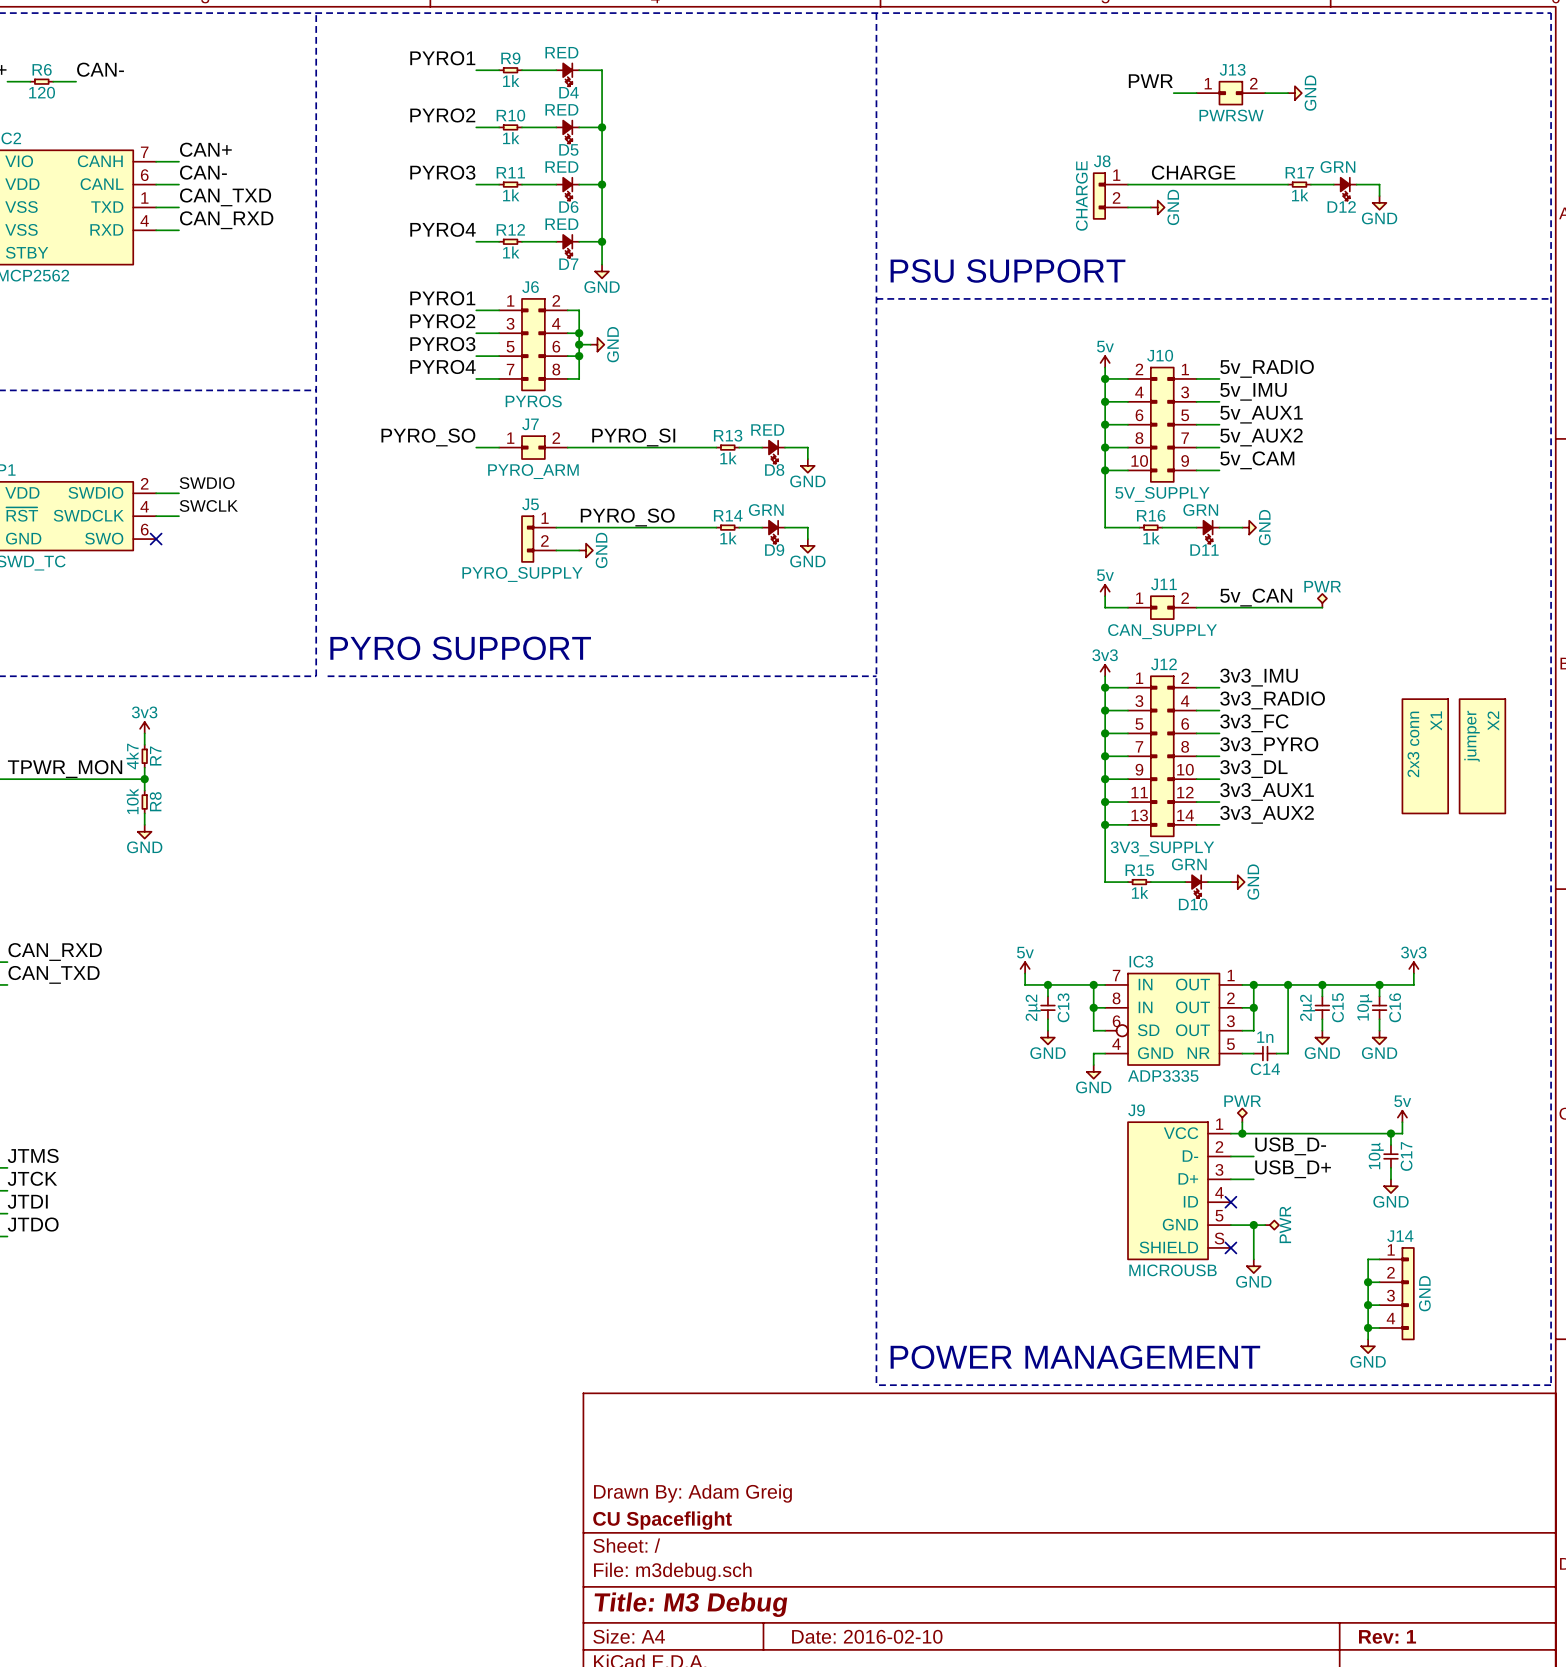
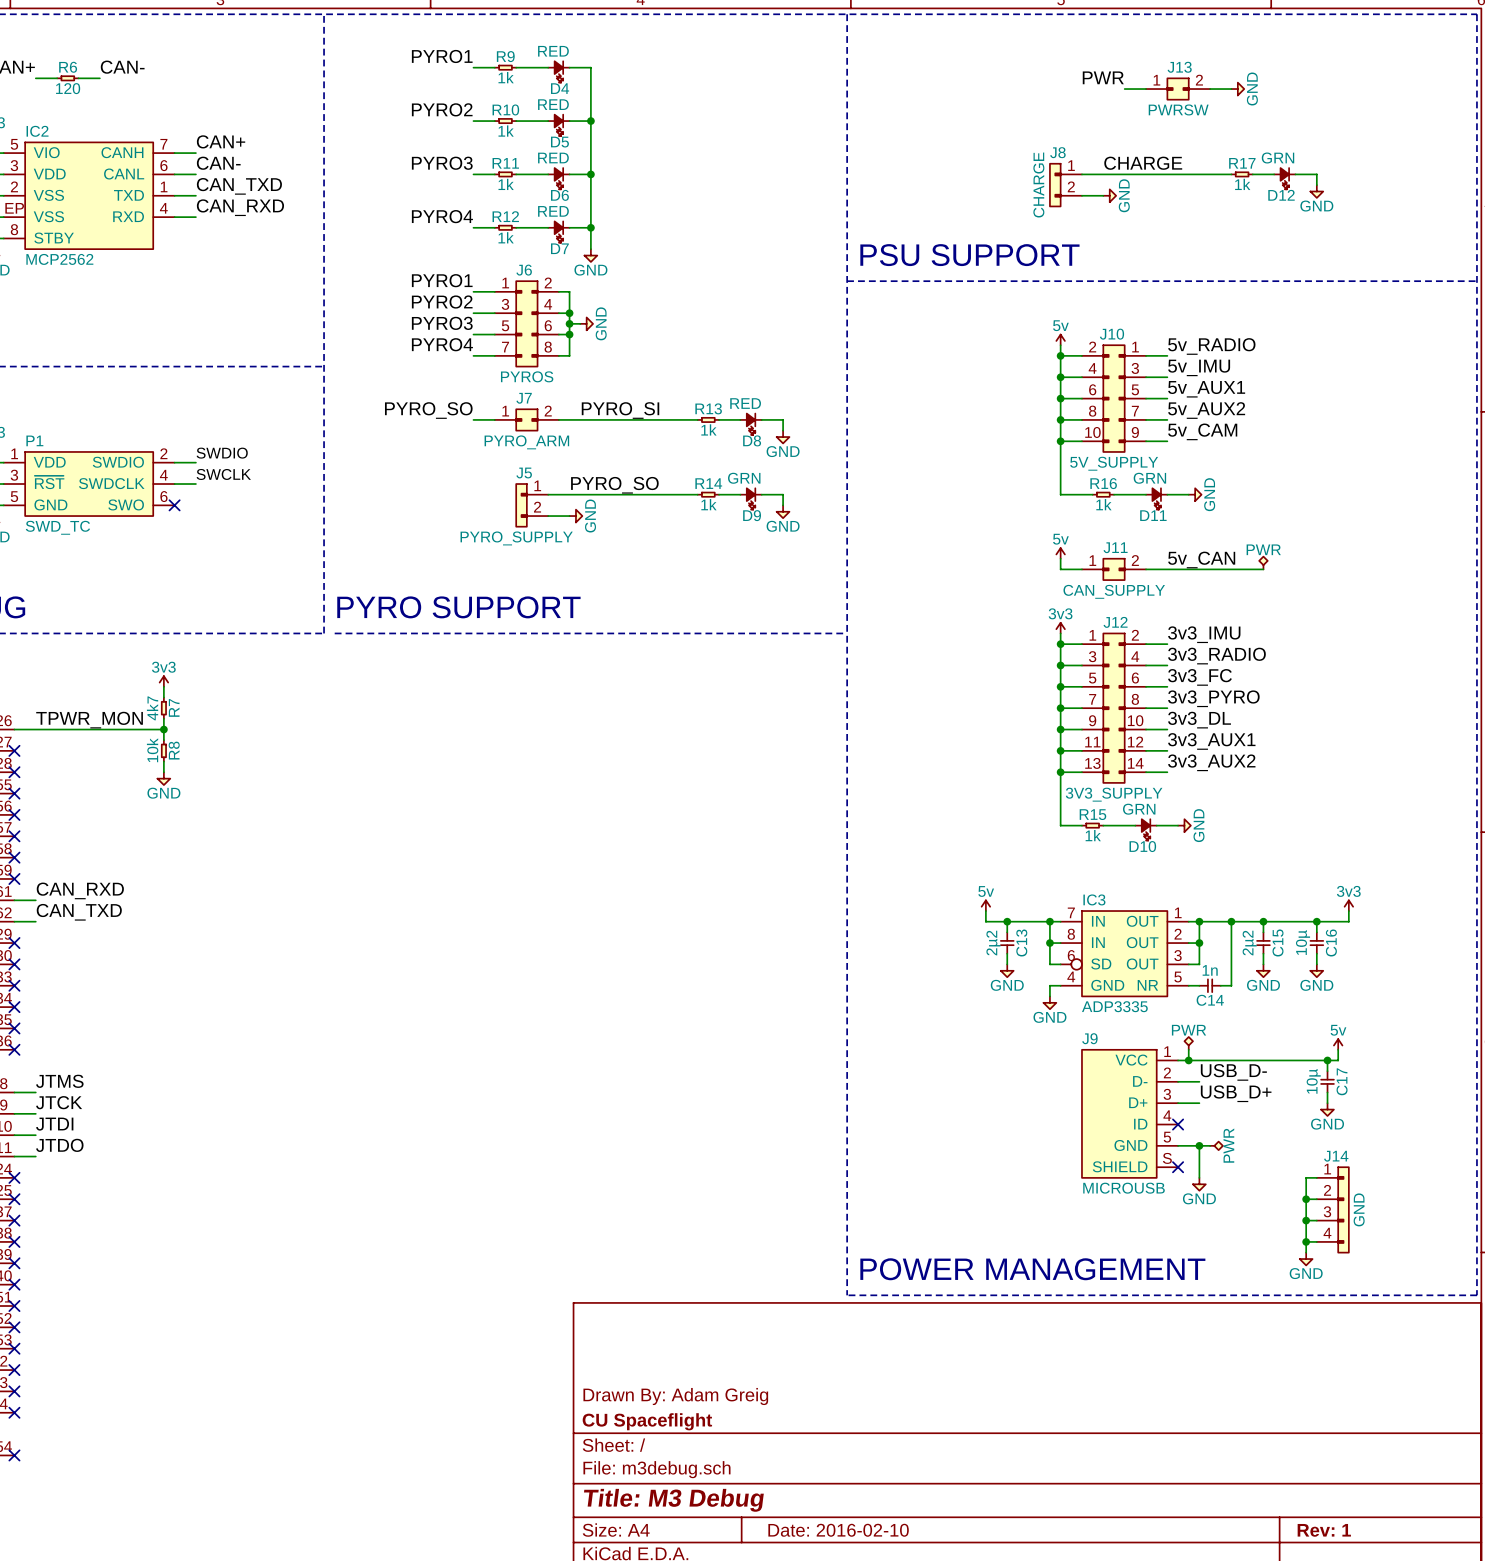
X1: 2x3 conn (1425, 756) -> none
X2: jumper (1482, 756) -> none

